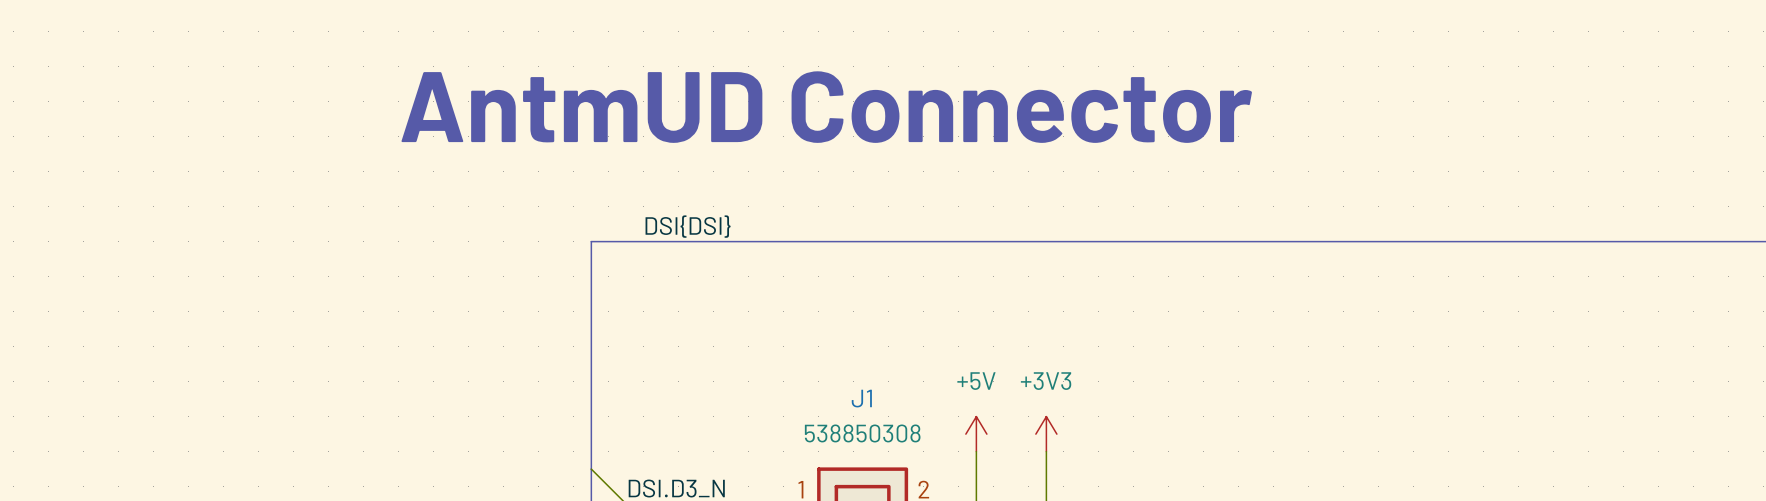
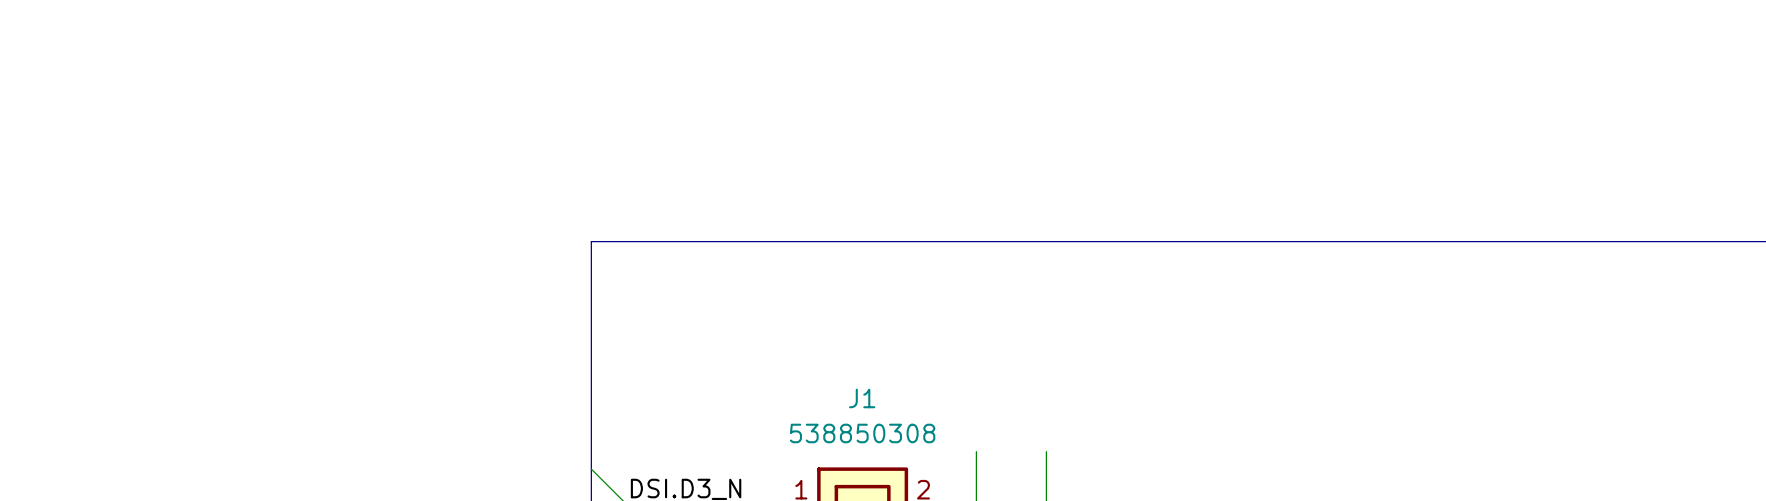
text: AntmUD Connector (826, 107) -> none
label: DSI{DSI} (688, 226) -> none
power symbol: +5V (976, 434) -> none
power symbol: +3V3 (1046, 434) -> none

